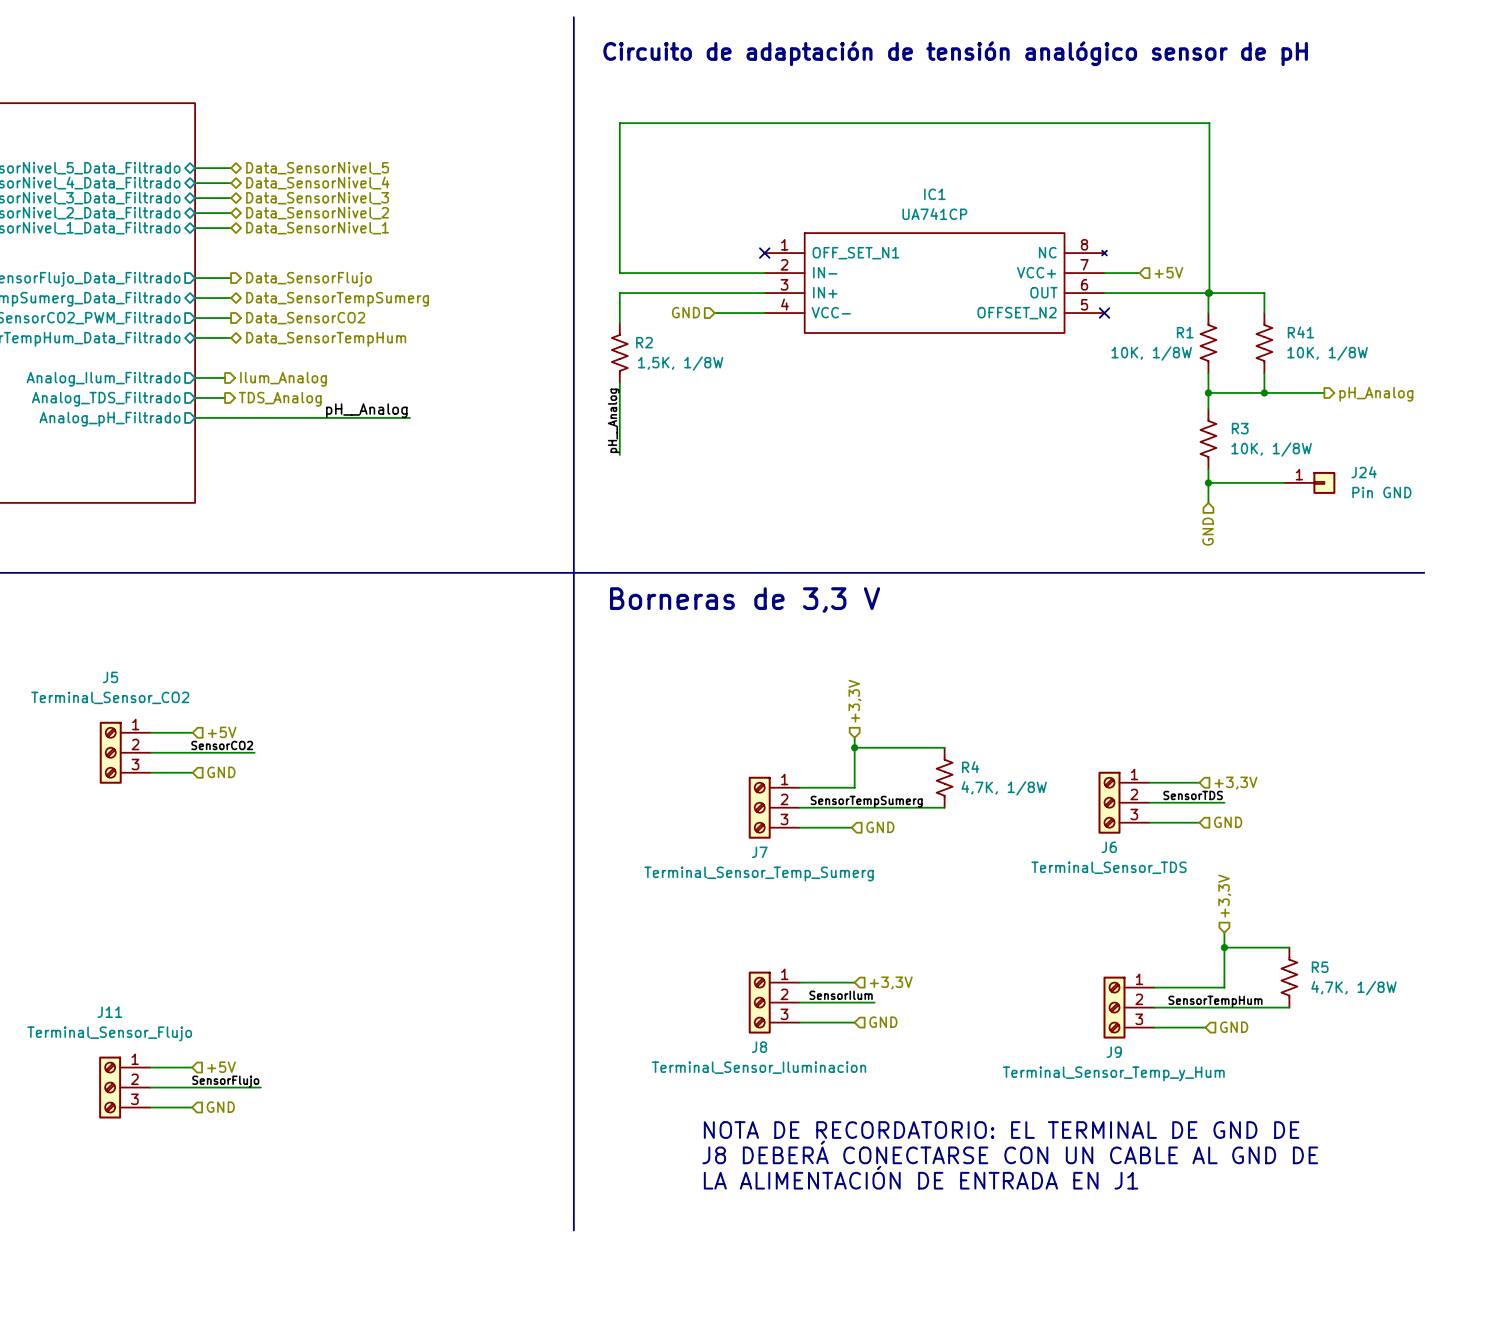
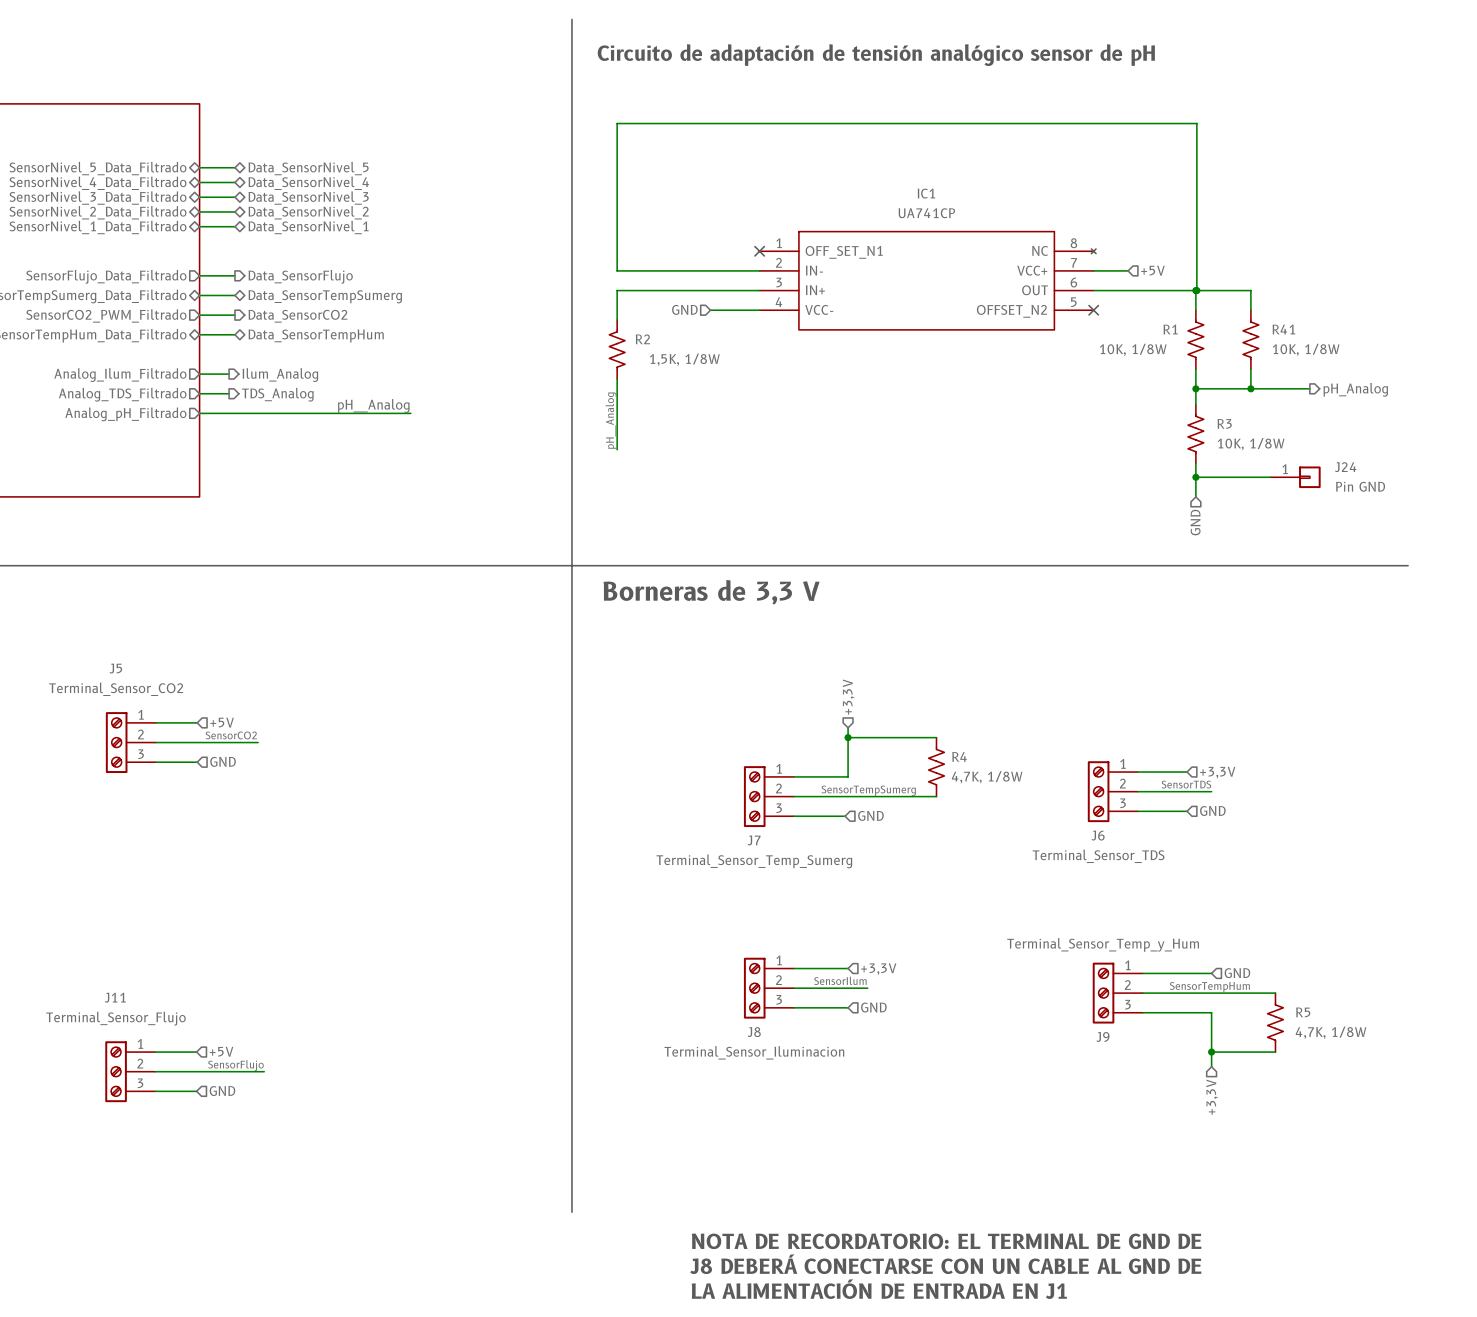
hierarchical label rotation: 0° (1224, 896) -> 180° (1212, 1097)
hierarchical label position: +3,3V (1224, 896) -> +3,3V (1212, 1097)
wire: (1224, 932) (1224, 987) -> none
wire: (1224, 947) (1289, 947) -> (1211, 1052) (1275, 1052)
junction: (1224, 947) -> none
R5 position: (1289, 977) -> (1275, 1022)
wire: none -> (1192, 1012) (1211, 1012) (1211, 1066)
hierarchical label position: GND (1234, 1027) -> GND (1237, 973)
junction: none -> (1211, 1052)
J9 value position: Terminal_Sensor_Temp_y_Hum (1113, 1073) -> Terminal_Sensor_Temp_y_Hum (1103, 944)
text position: NOTA DE RECORDATORIO: EL TERMINAL DE GND DE (1001, 1130) -> NOTA DE RECORDATORIO: EL TERMINAL DE GND DE (946, 1241)
text position: J8 DEBERÁ CONECTARSE CON UN CABLE AL GND DE (1010, 1152) -> J8 DEBERÁ CONECTARSE CON UN CABLE AL GND DE (945, 1264)
text position: LA ALIMENTACIÓN DE ENTRADA EN J1 (921, 1177) -> LA ALIMENTACIÓN DE ENTRADA EN J1 (879, 1289)

